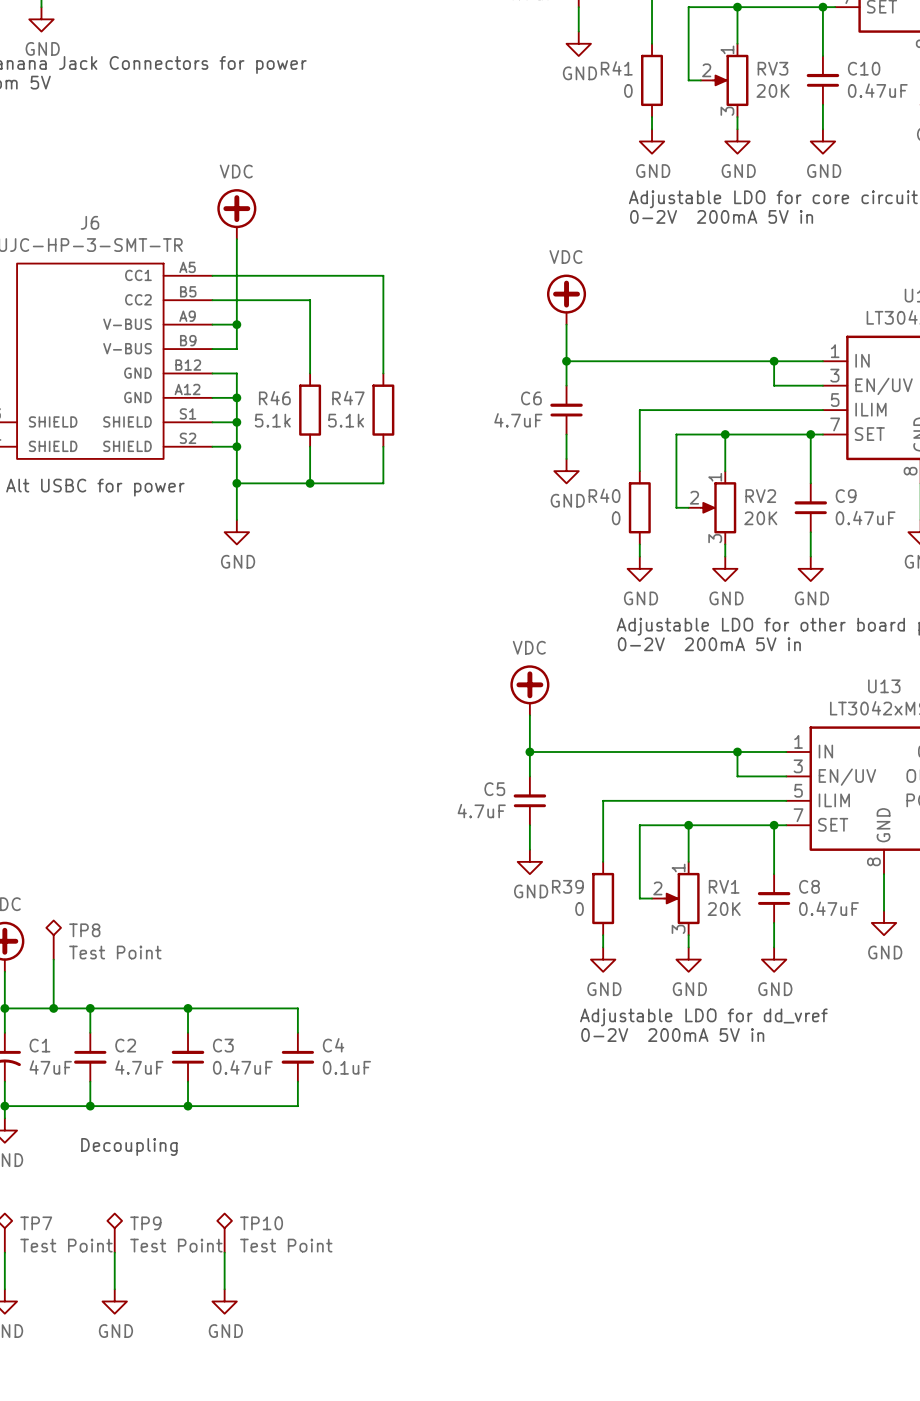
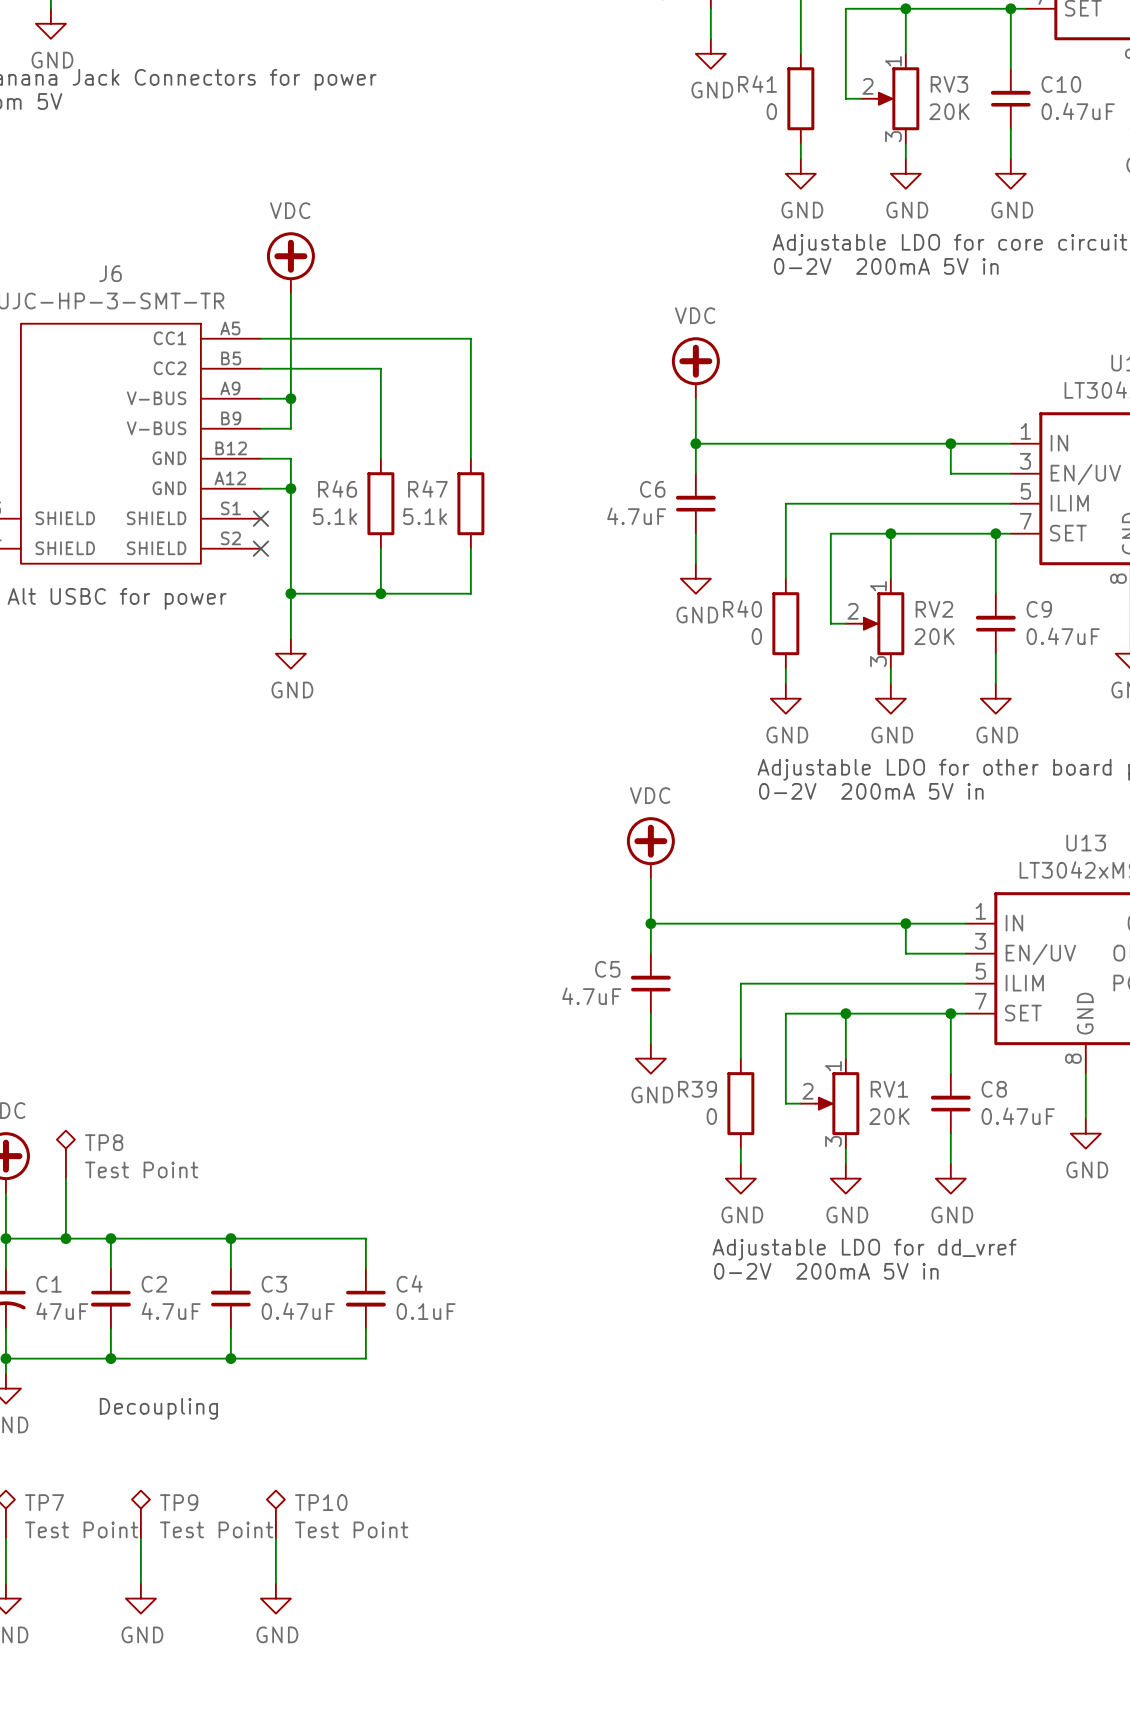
wire: (212, 422) (236, 422) -> none
no-connect mark: none -> (260, 518)
junction: (236, 422) -> none
wire: (212, 446) (236, 446) -> none
no-connect mark: none -> (260, 548)
junction: (236, 446) -> none

